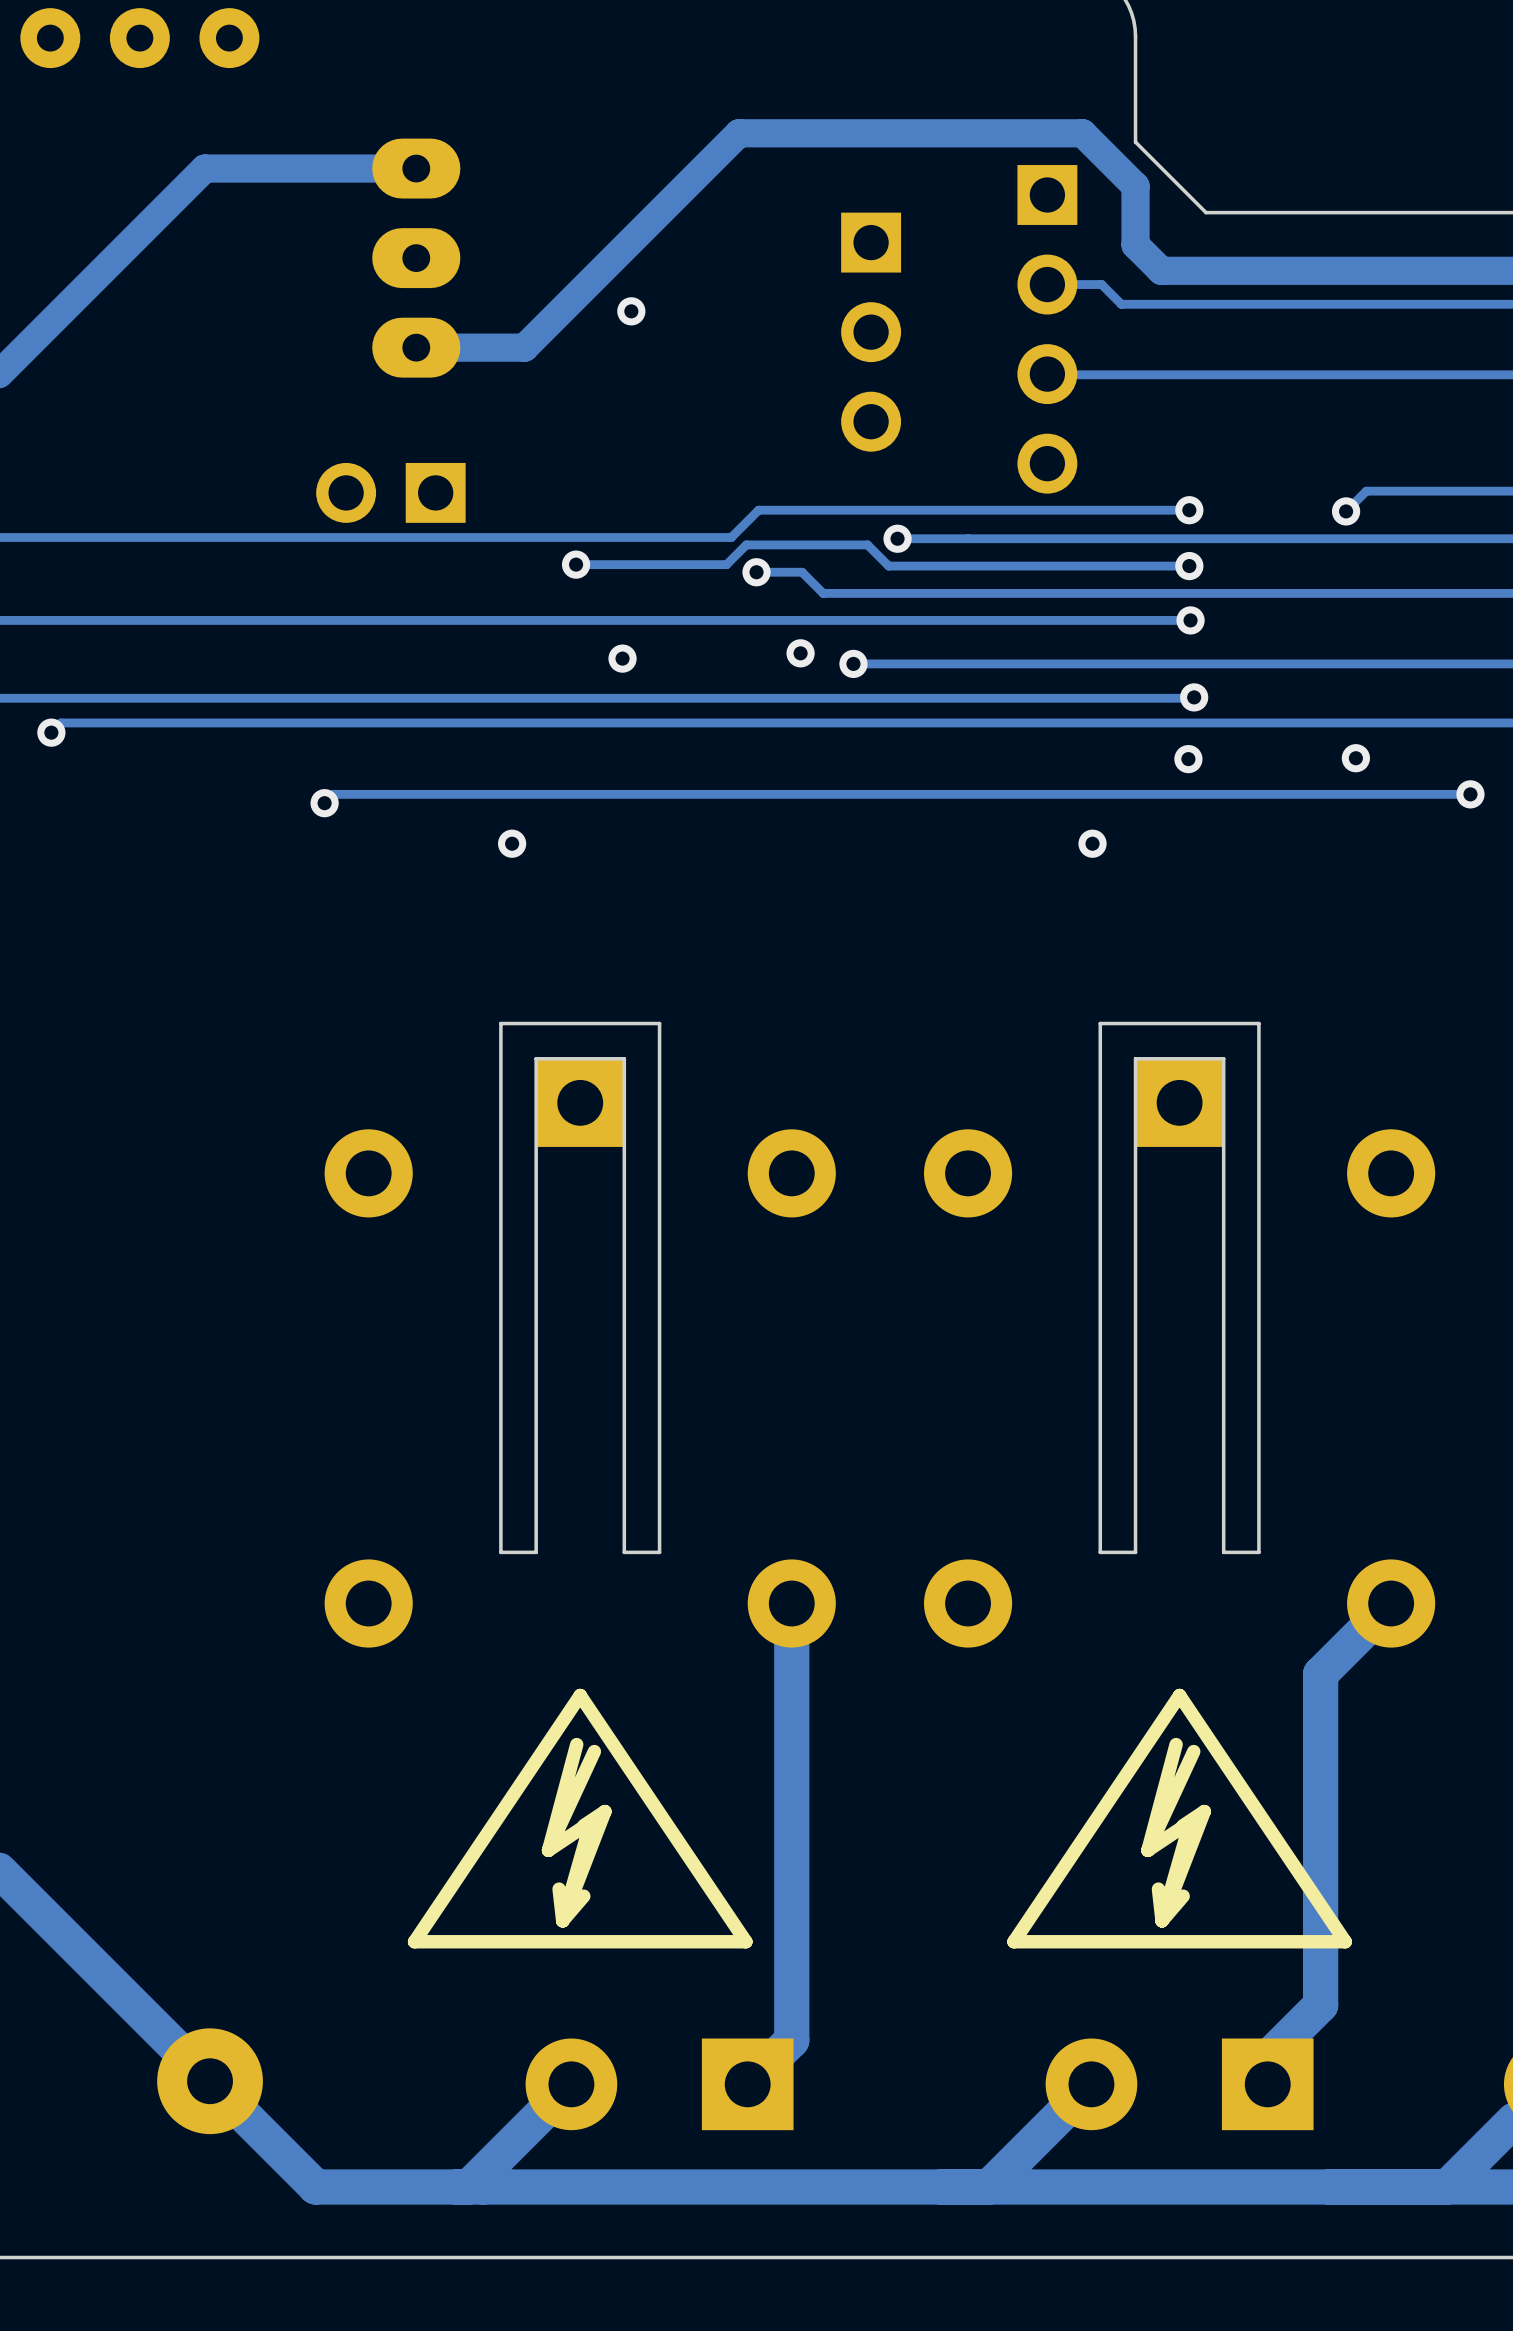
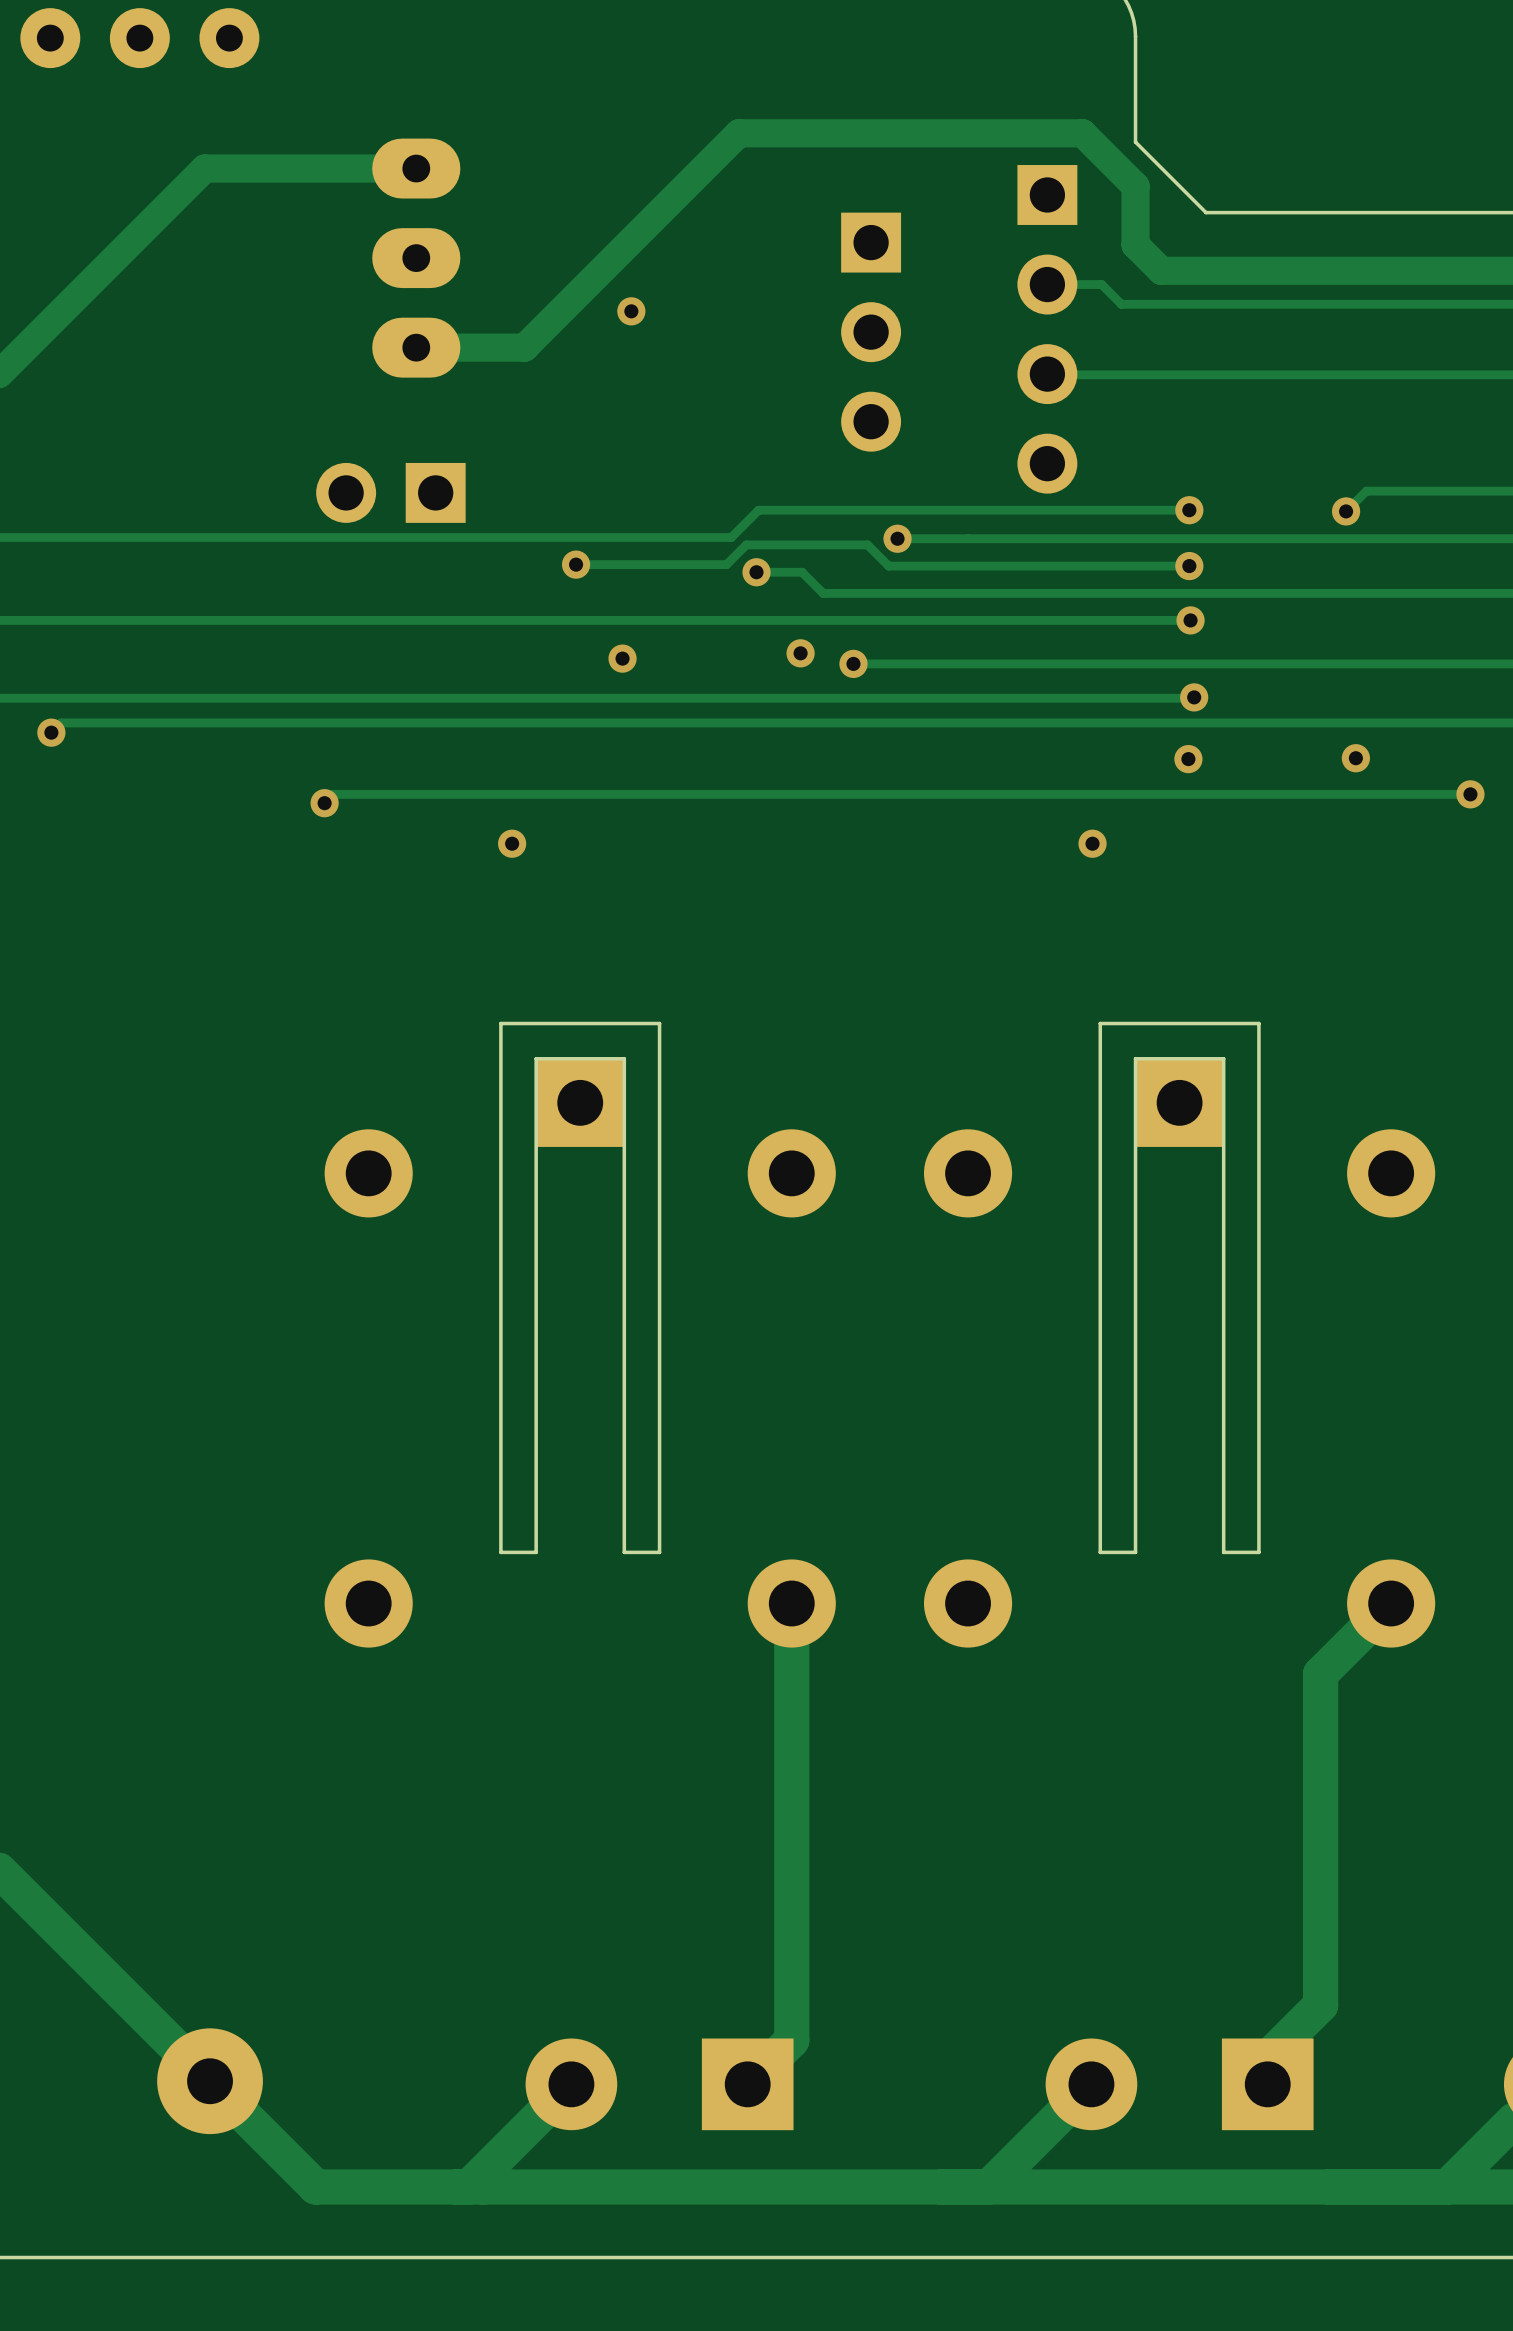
drawing: [407, 1688, 753, 1949] -> none
drawing: [1007, 1688, 1352, 1949] -> none

